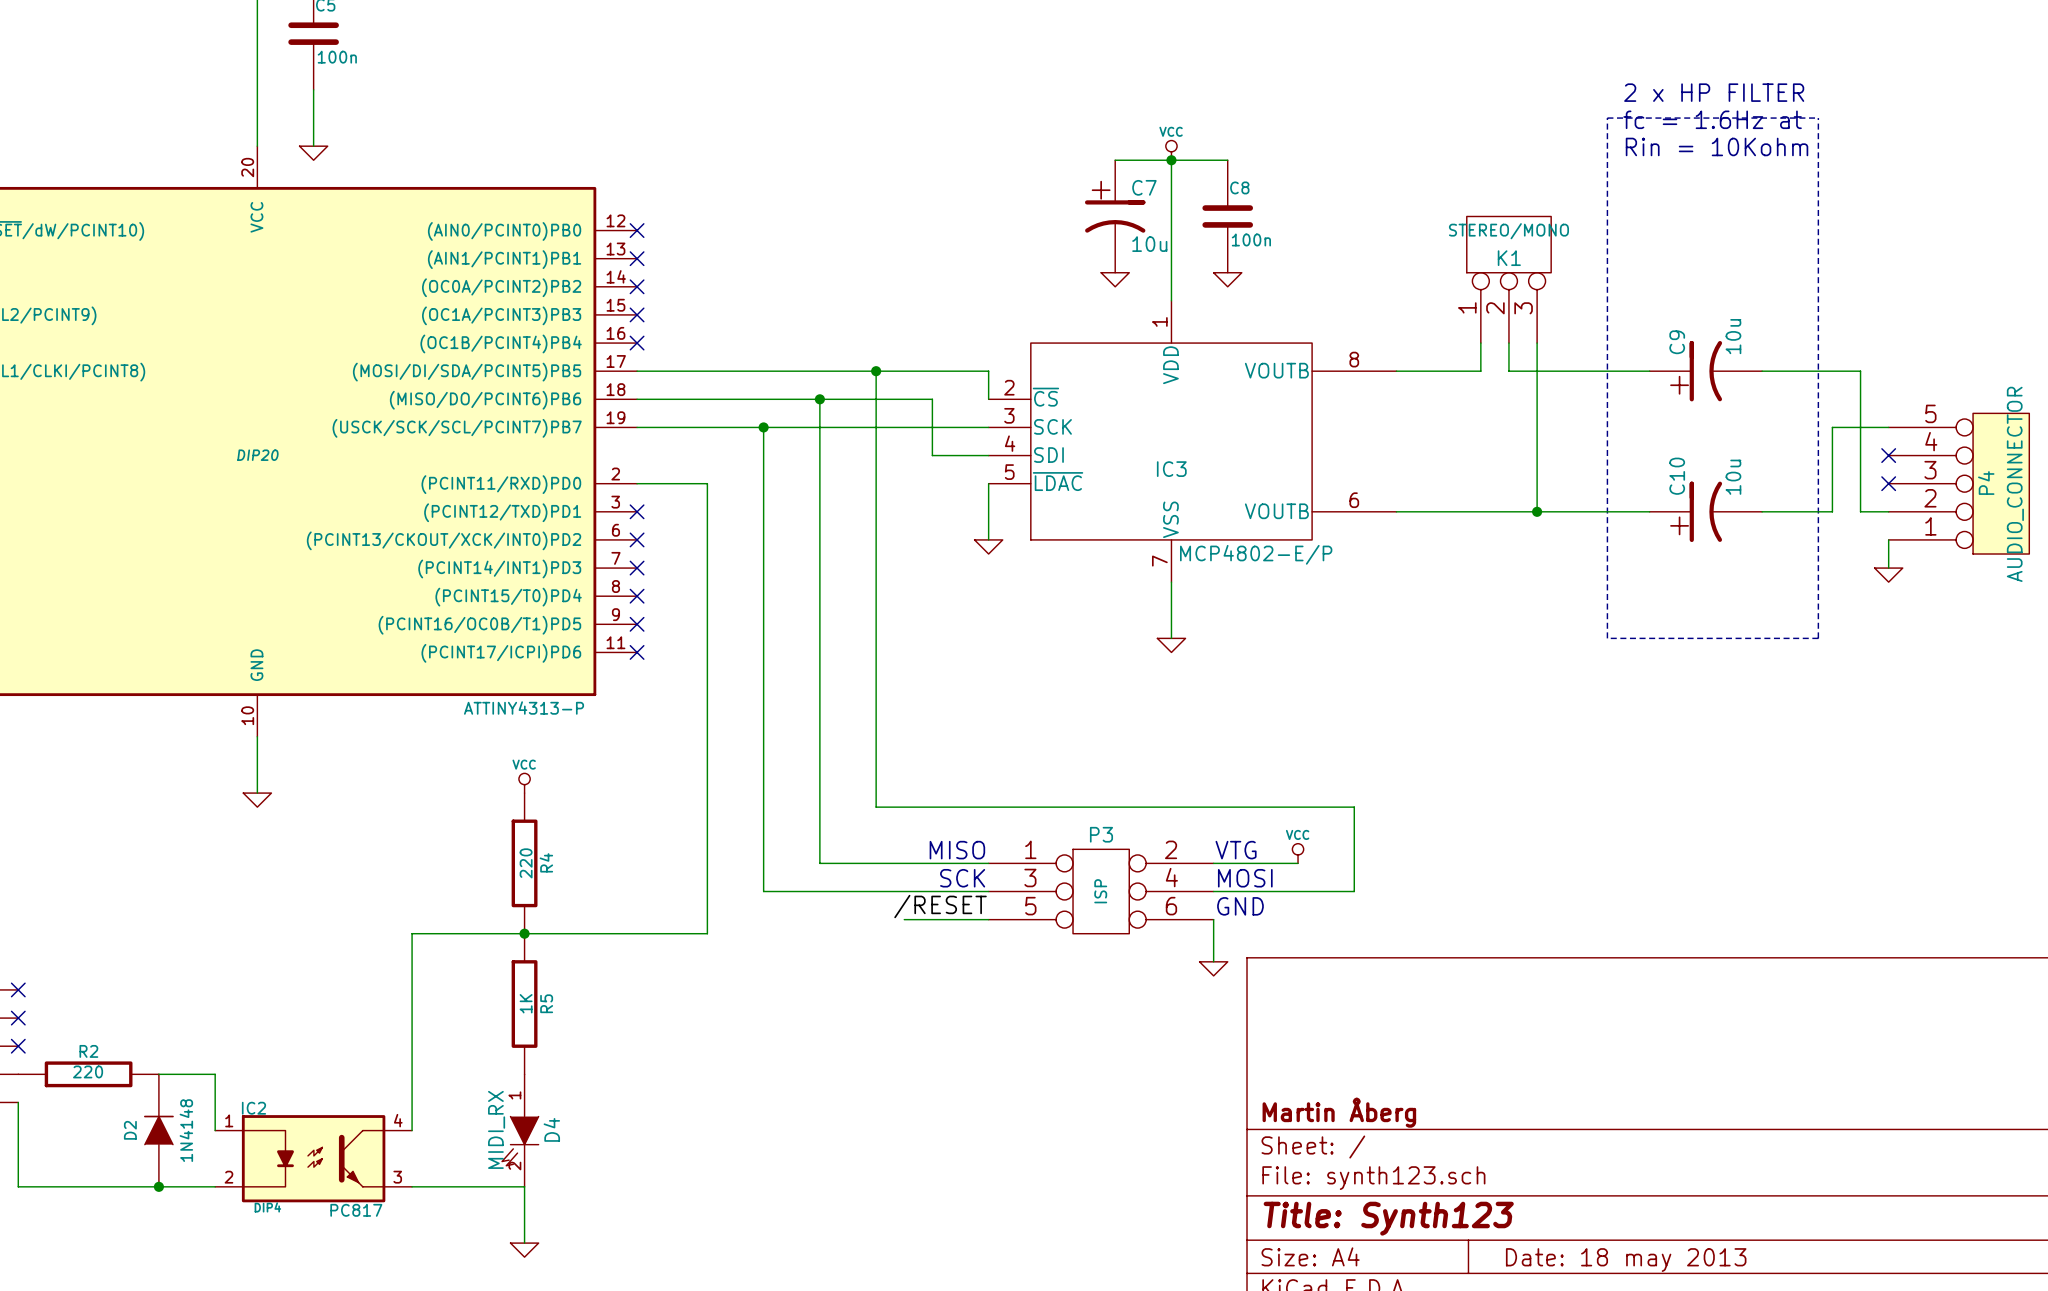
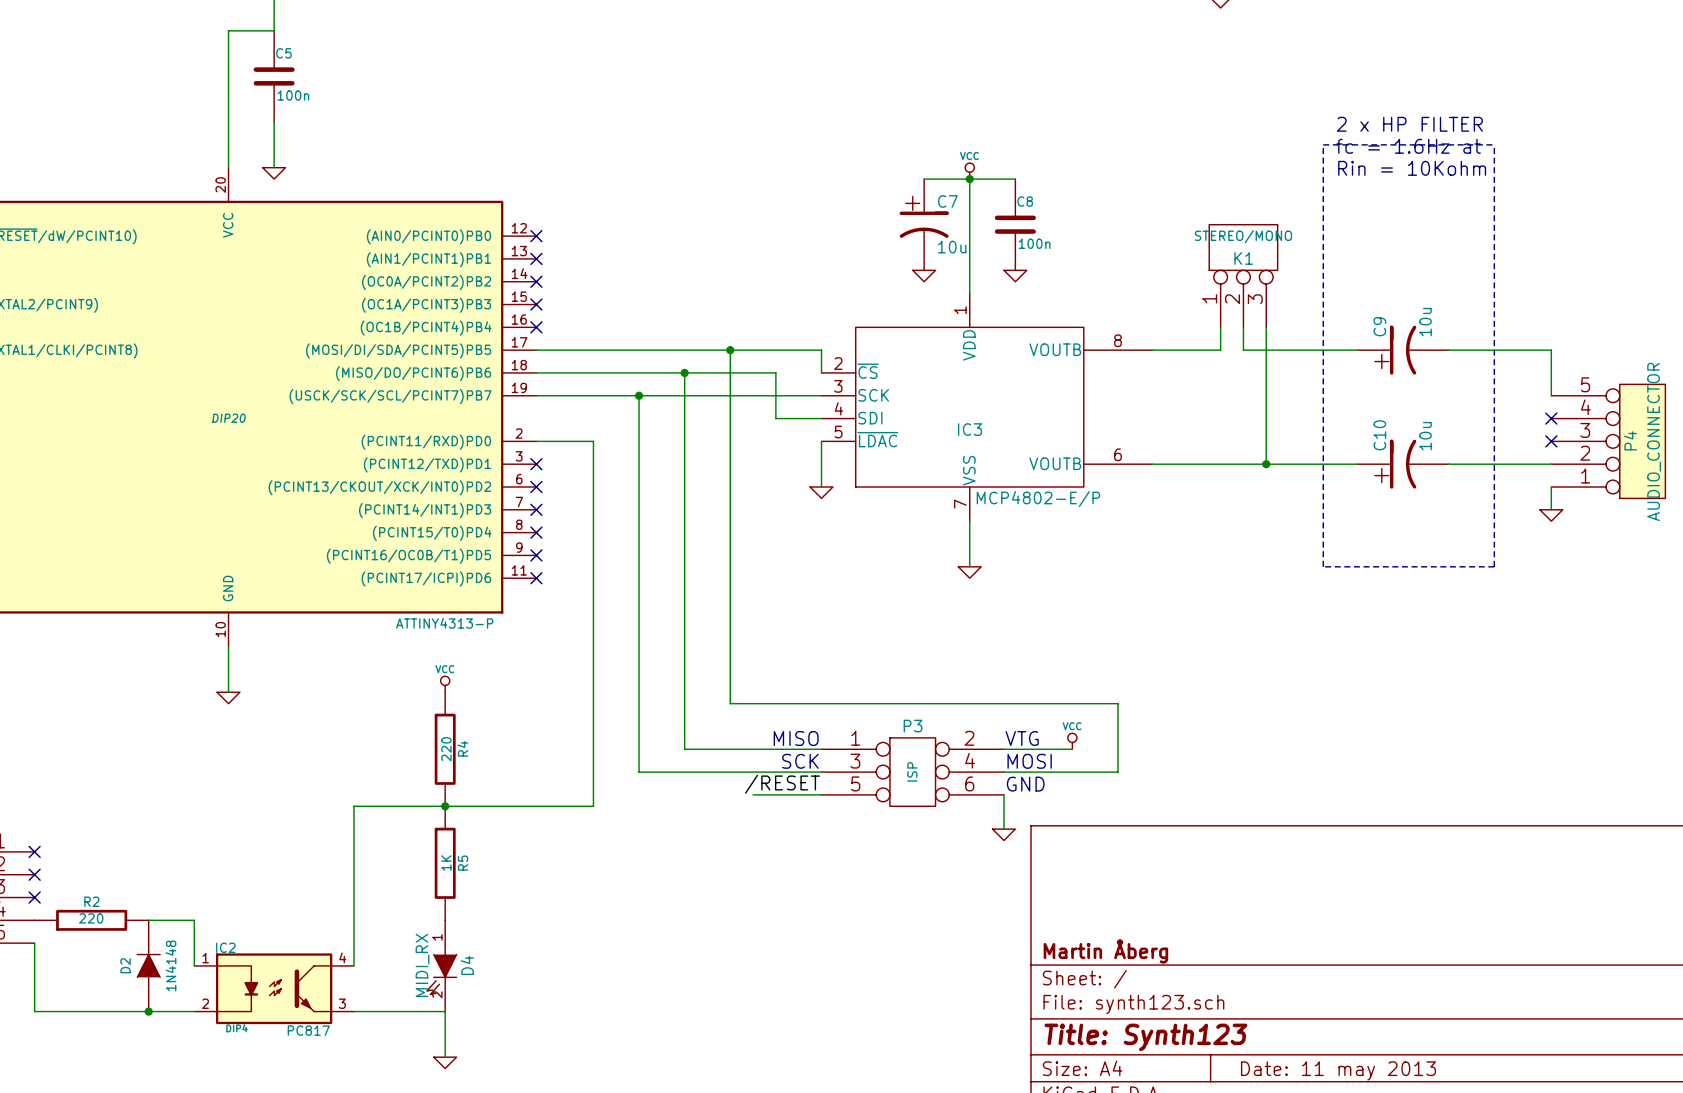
wire: (1860, 371) (1860, 511) -> (1528, 350) (1551, 350) (1551, 395)
wire: (1888, 427) (1832, 427) (1832, 511) -> (1528, 464) (1505, 464)
title block: Date: 18 may 2013 (1626, 1260) -> Date: 11 may 2013 (1338, 1070)

